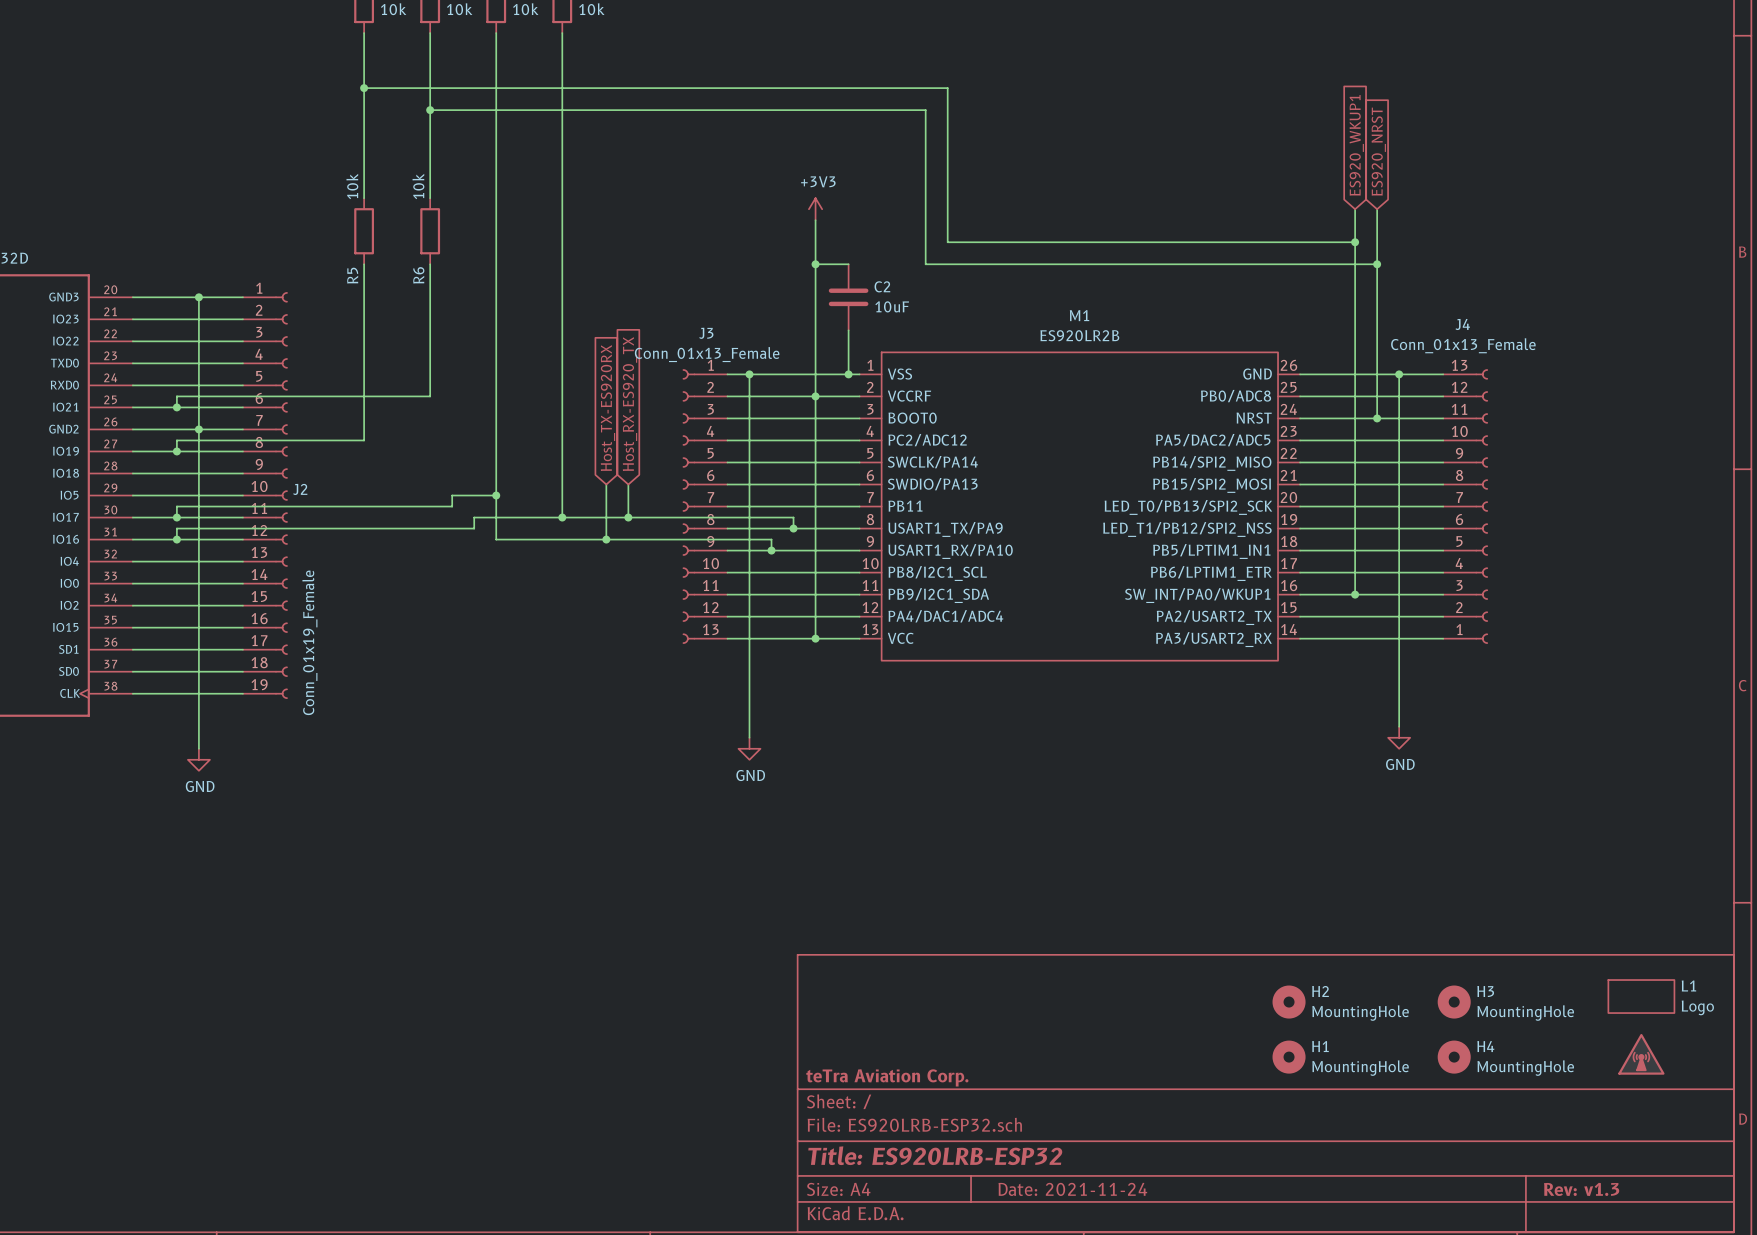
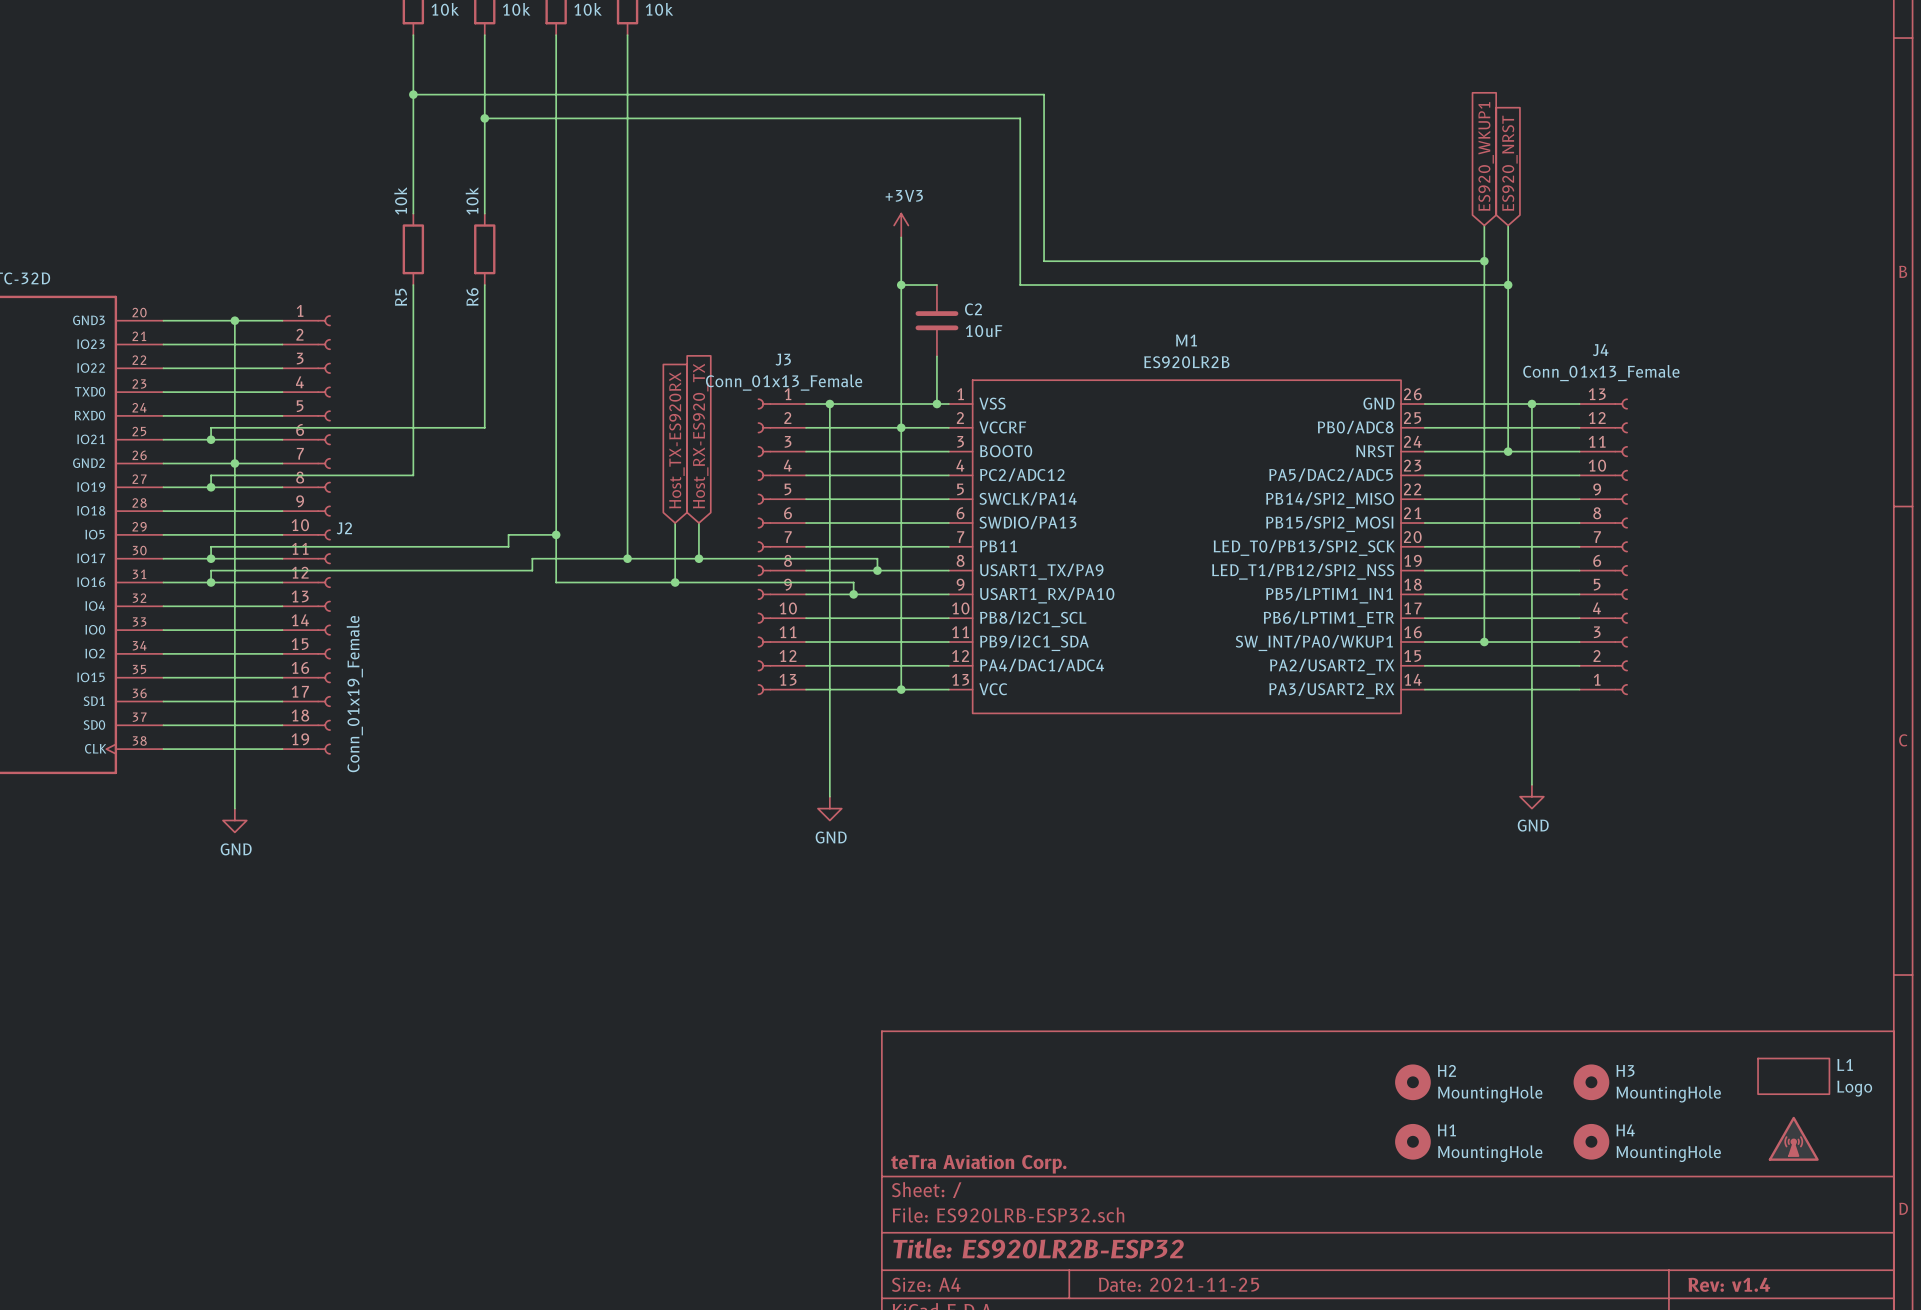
title block: Title: ES920LRB-ESP32 (935, 1155) -> Title: ES920LR2B-ESP32 (1038, 1248)
title block: Date: 2021-11-24 (1072, 1189) -> Date: 2021-11-25 (1179, 1284)
title block: Rev: v1.3 (1581, 1189) -> Rev: v1.4 (1729, 1284)

